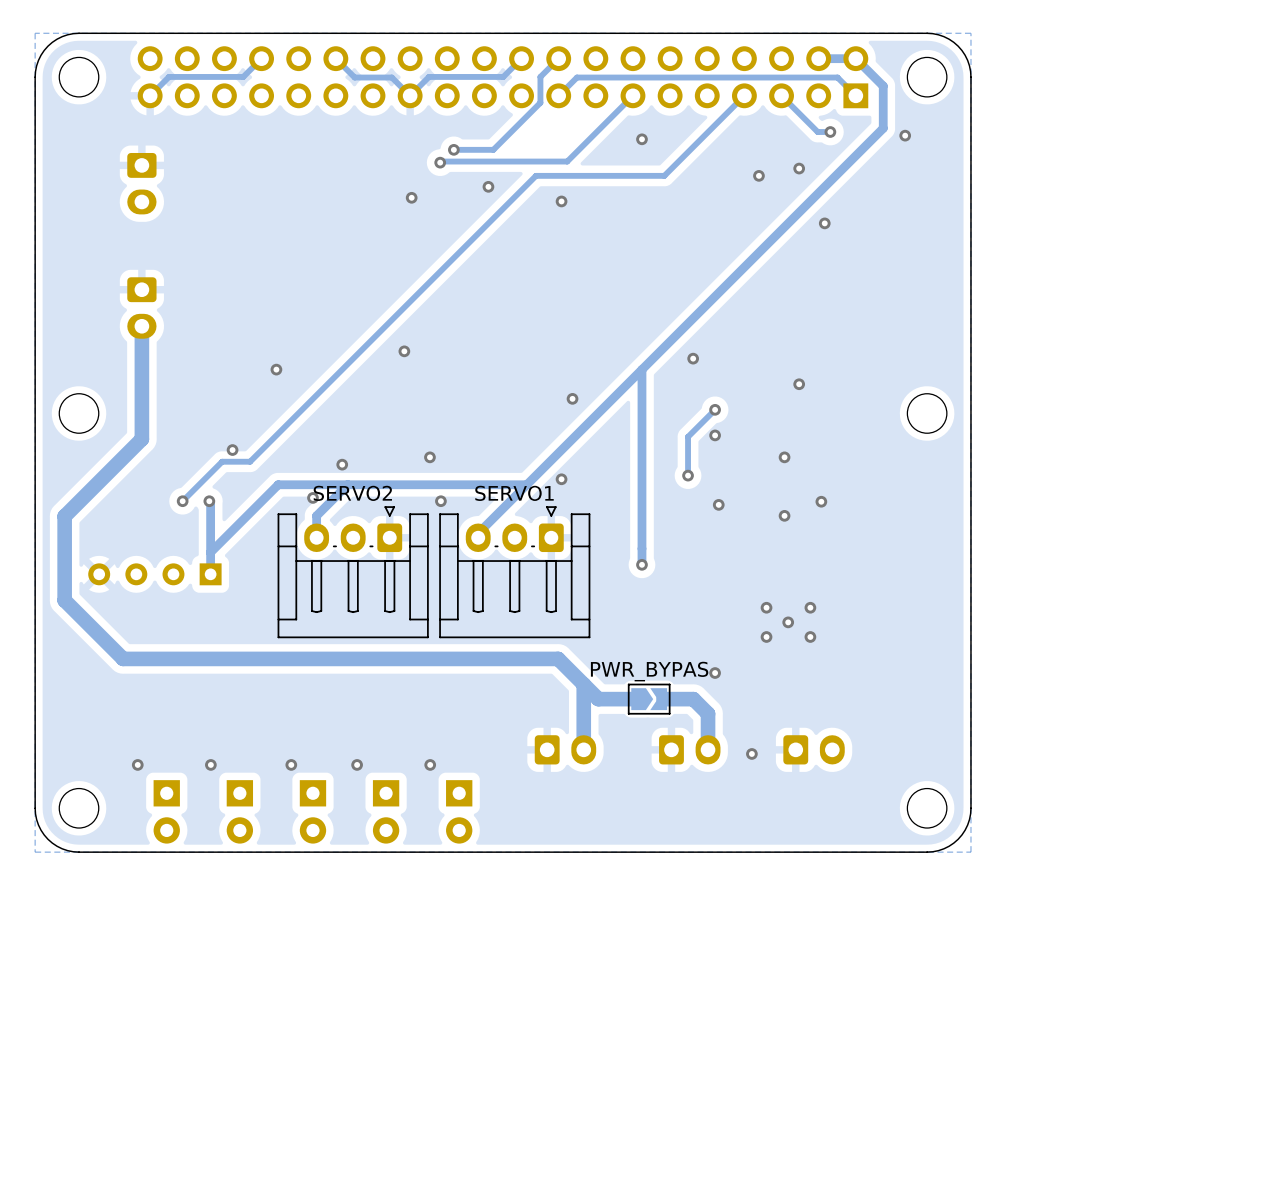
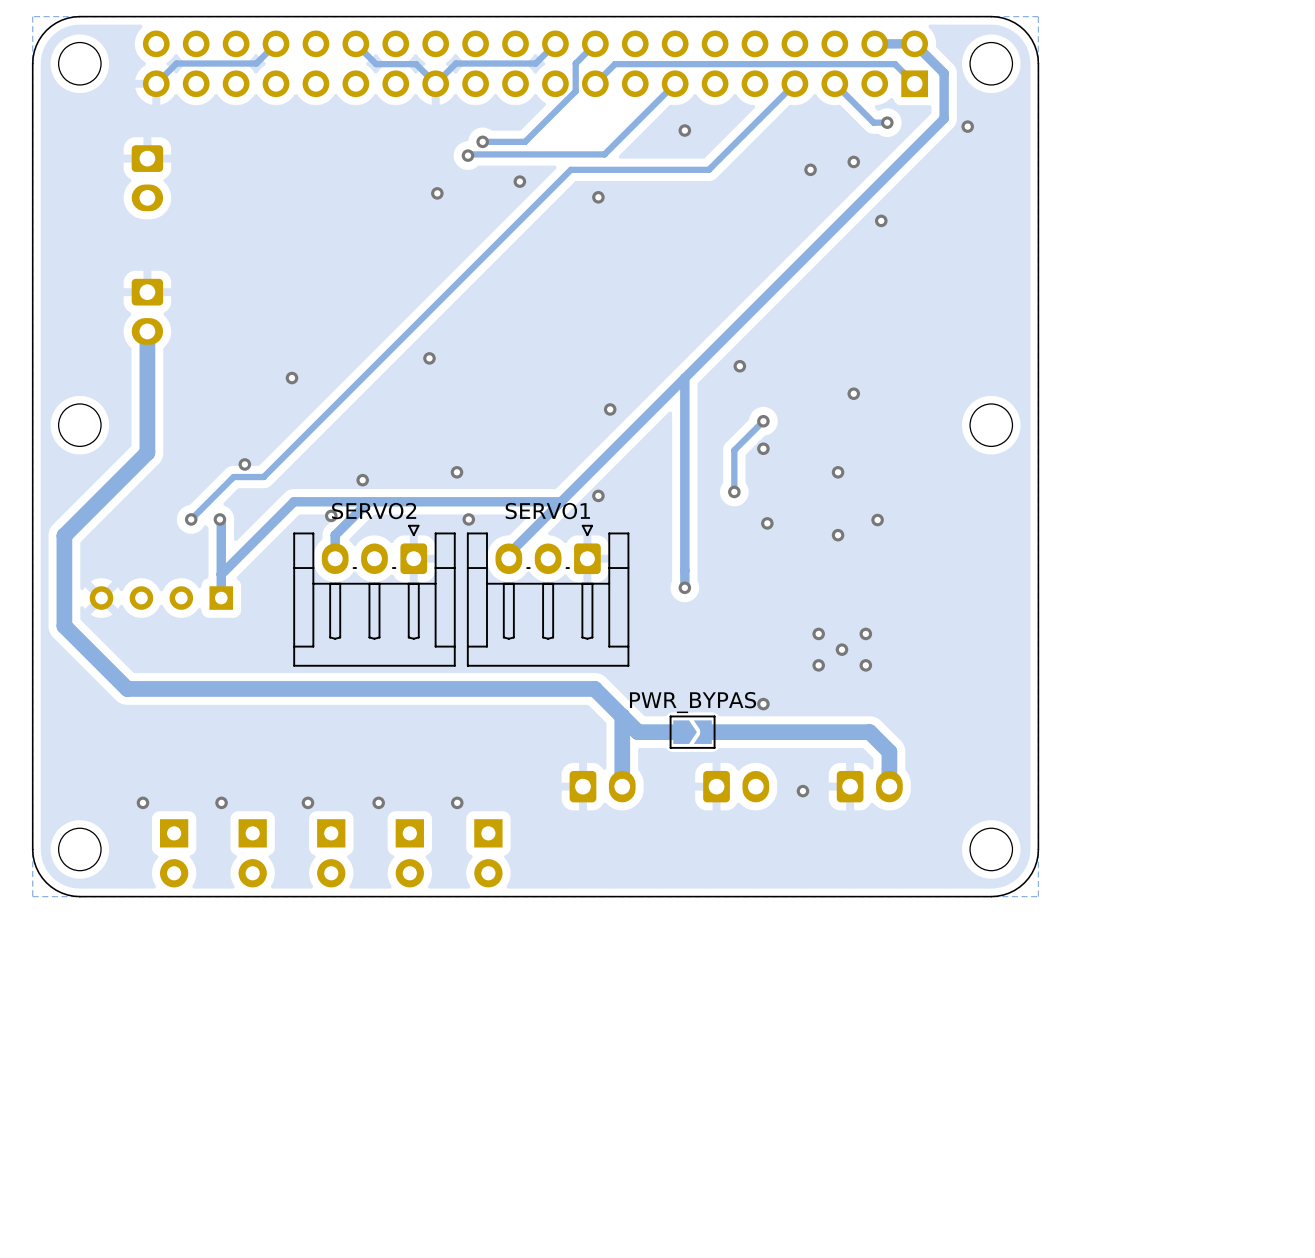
track: (693, 699) (708, 713) (708, 749) -> (740, 732) (869, 732) (889, 751) (889, 786)

